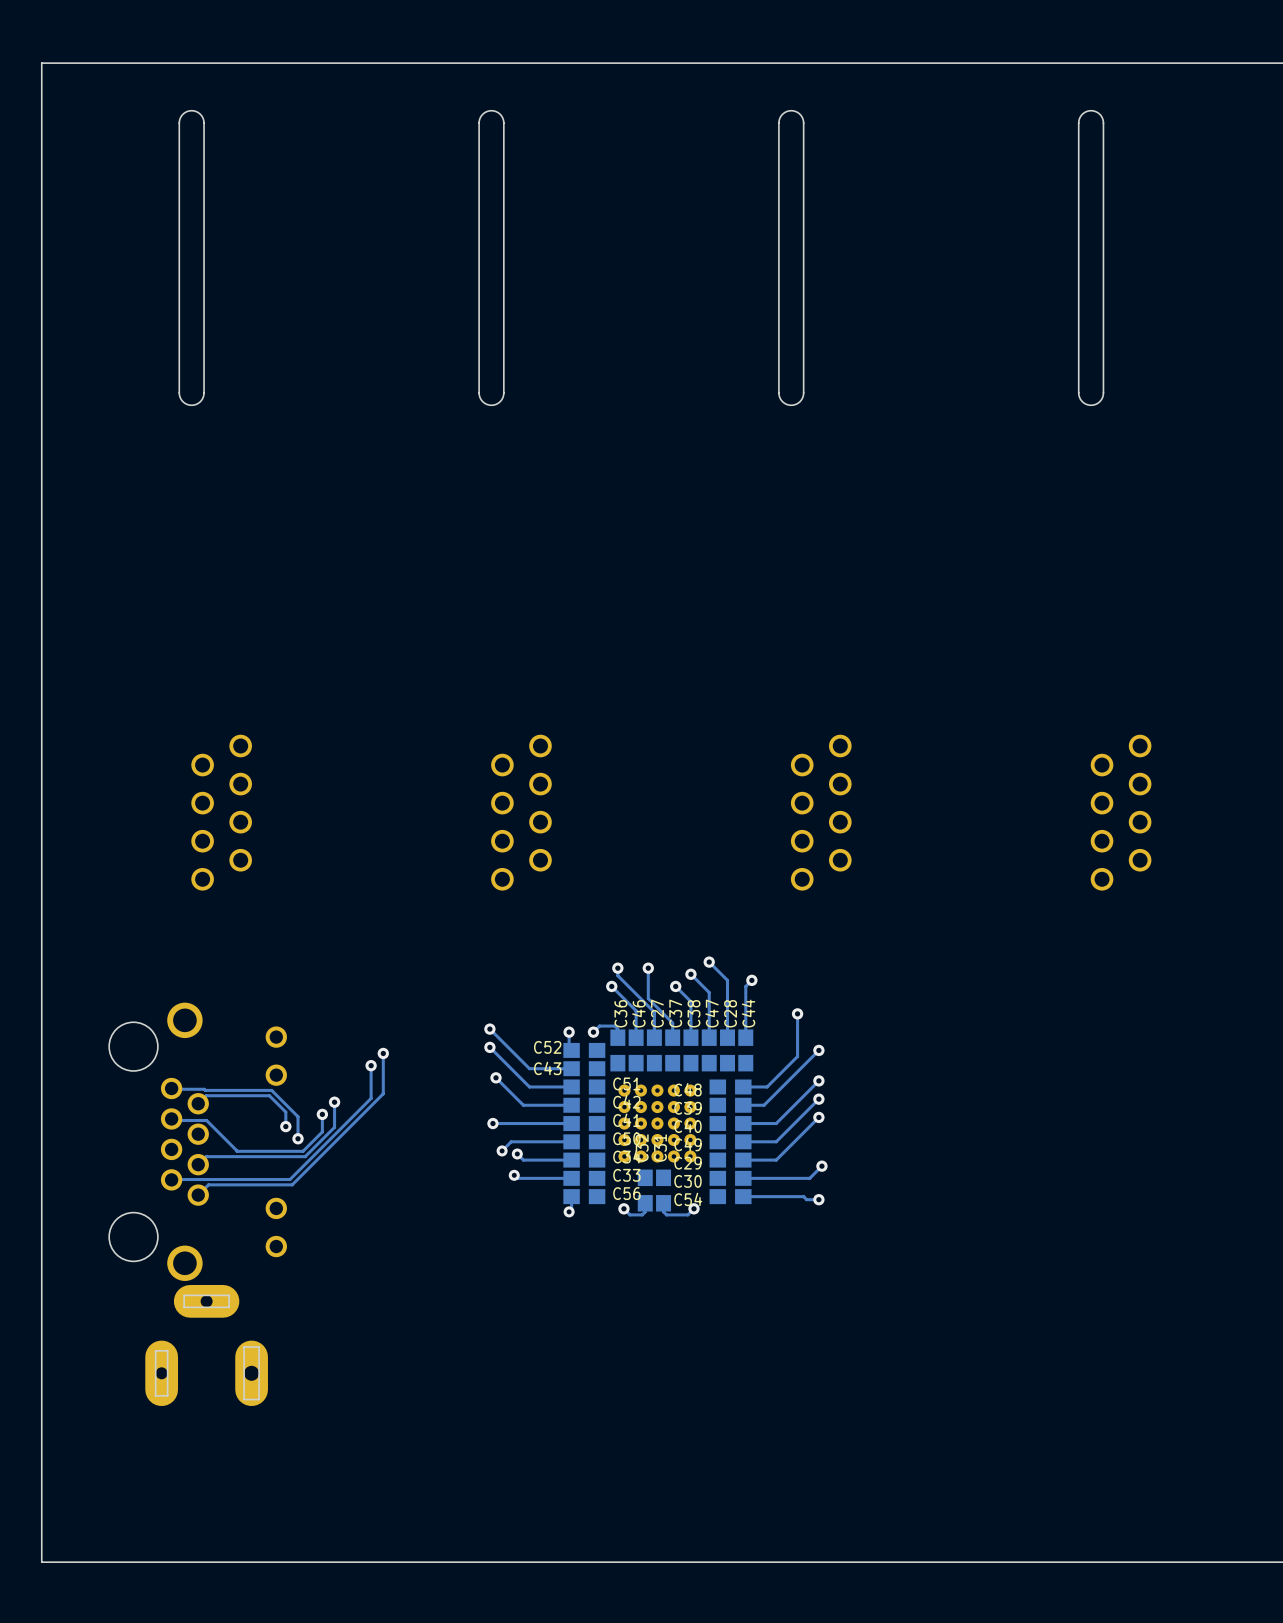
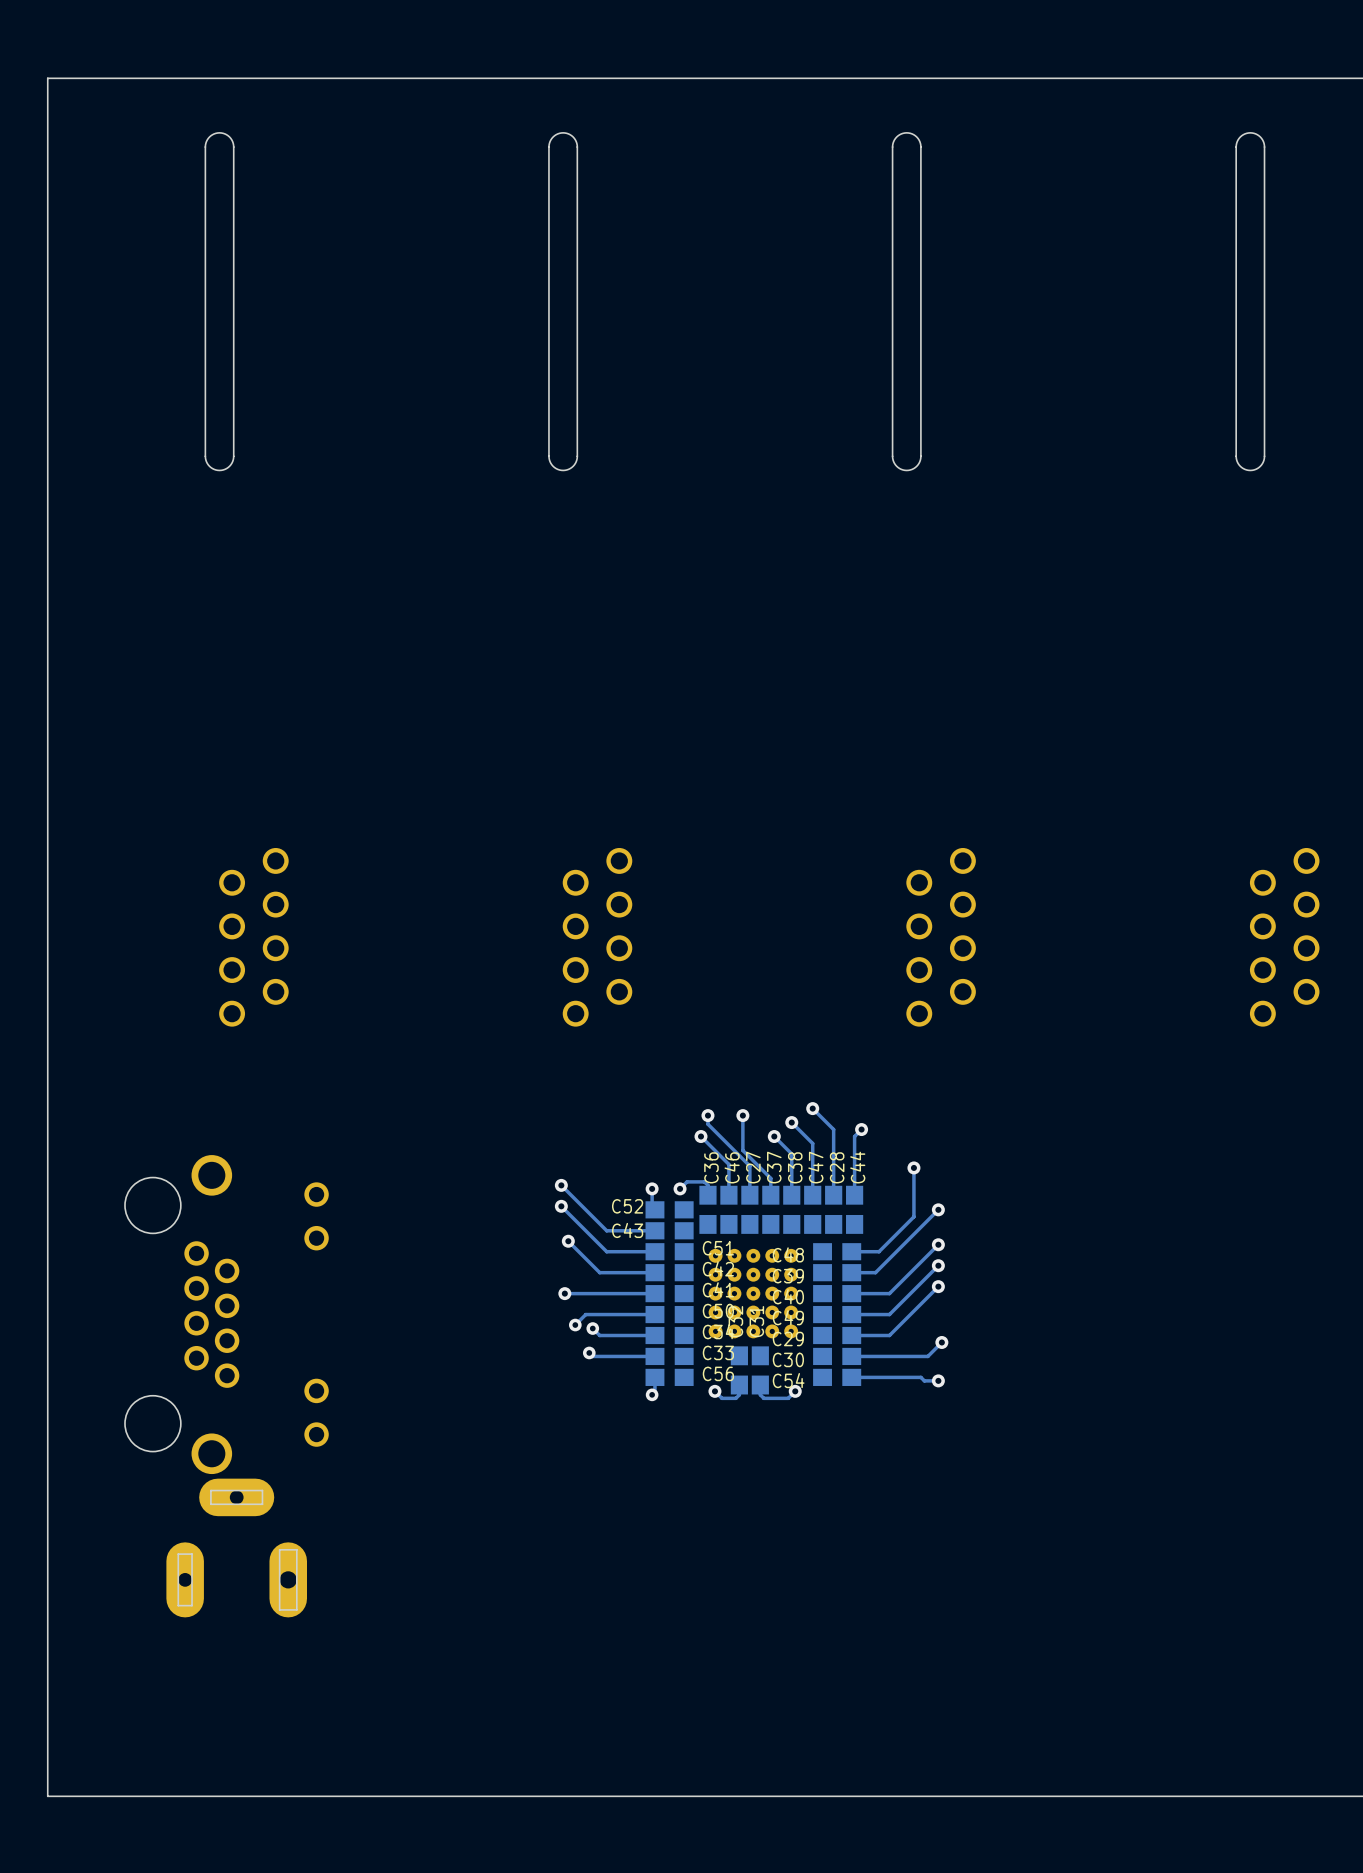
track: (383, 1053) (383, 1093) (292, 1184) (208, 1184) (198, 1195) -> none
via: (383, 1053) -> none
track: (371, 1065) (371, 1098) (290, 1179) (171, 1179) -> none
via: (371, 1065) -> none
track: (171, 1088) (271, 1090) (298, 1116) (298, 1138) -> none
track: (334, 1102) (334, 1127) (305, 1156) (206, 1156) (198, 1164) -> none
via: (334, 1102) -> none
track: (198, 1103) (206, 1095) (269, 1095) (285, 1112) (285, 1126) -> none
track: (322, 1114) (322, 1131) (303, 1151) (237, 1151) (206, 1120) (171, 1118) -> none
via: (322, 1114) -> none
via: (285, 1126) -> none
via: (298, 1138) -> none

